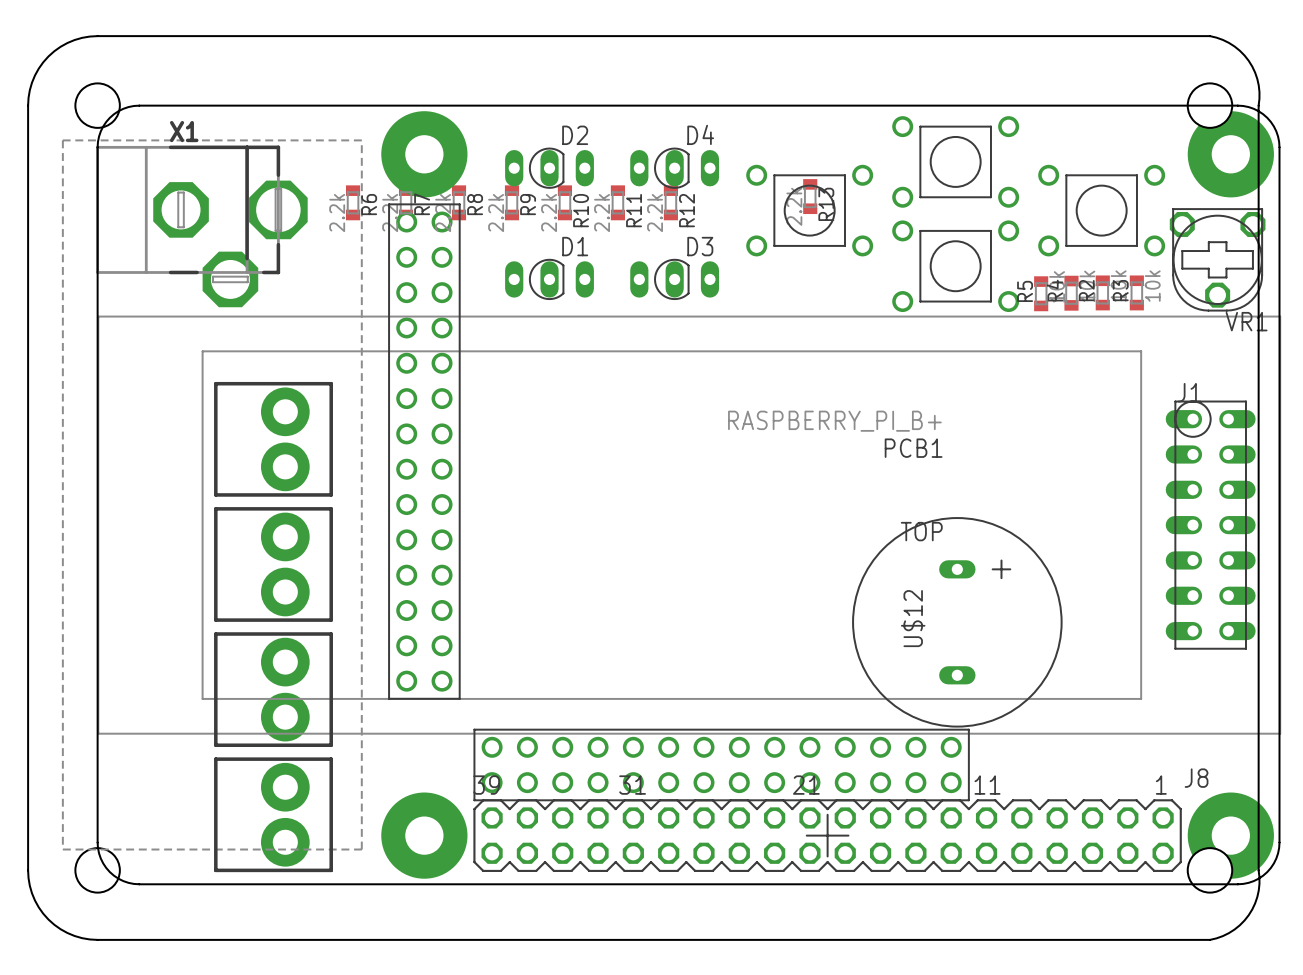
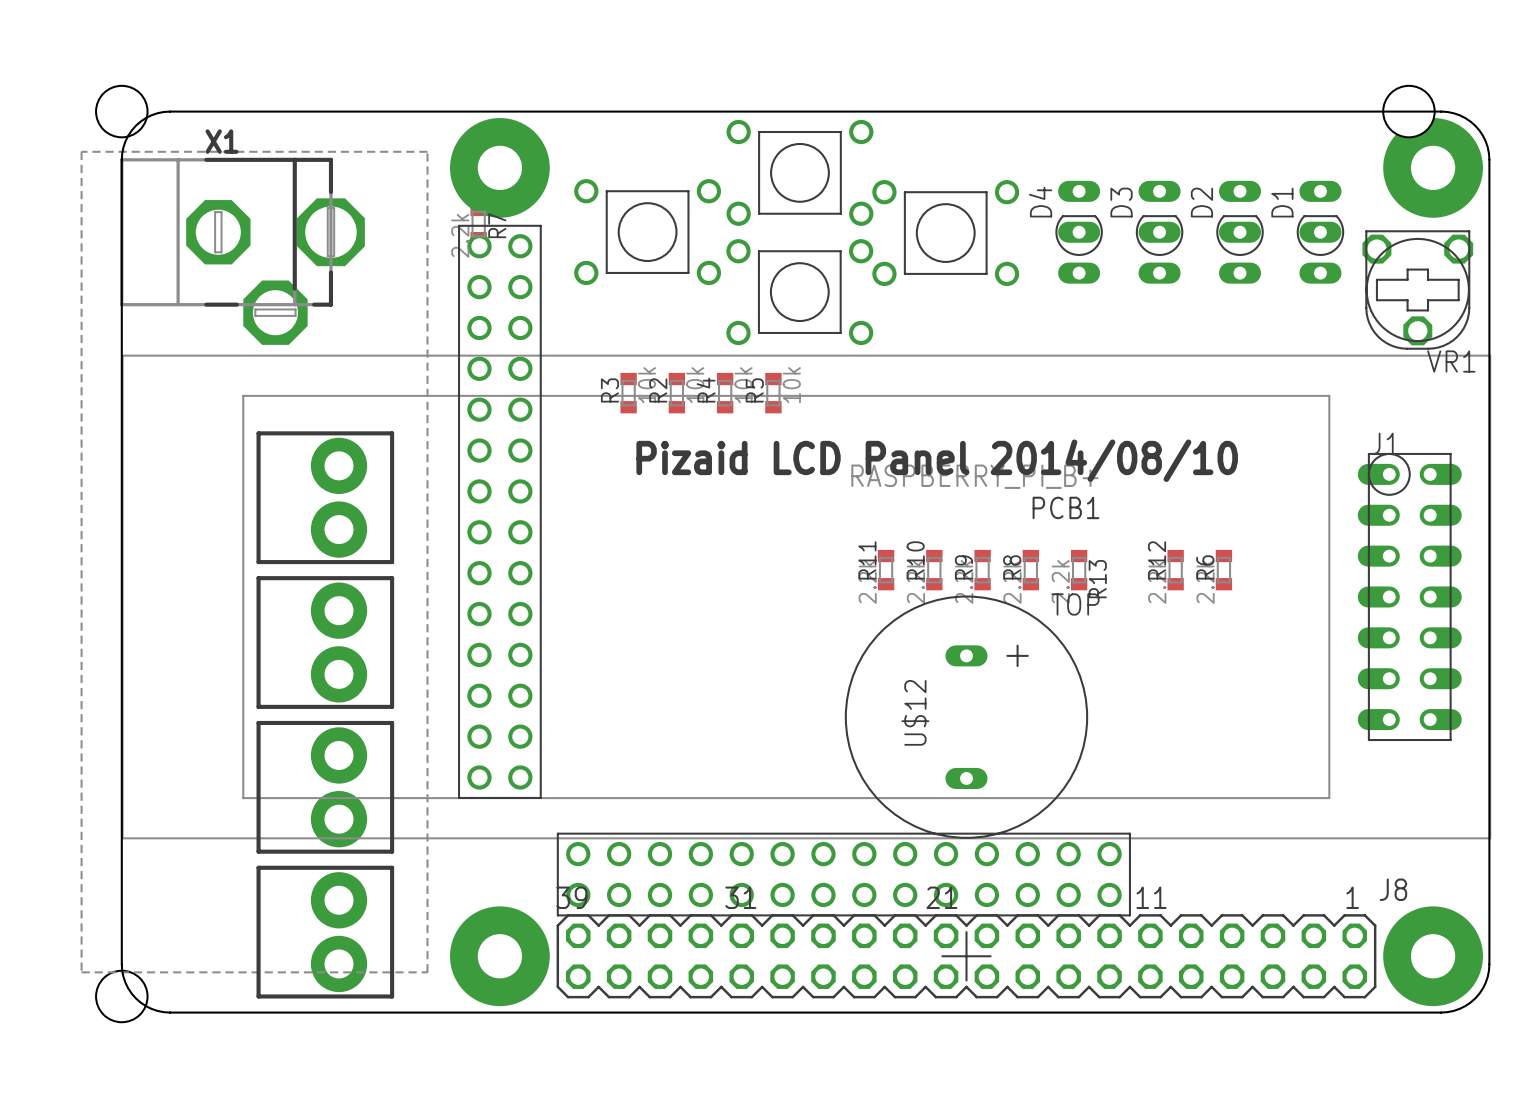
board edge: (97, 36) (1209, 36) (1222, 39) (1234, 46) (1244, 55) (1252, 66) (1257, 78) (1259, 92) (1259, 883) (1255, 903) (1248, 915) (1239, 925) (1228, 933) (1209, 939) (97, 939) (74, 935) (54, 924) (43, 913) (34, 900) (29, 885) (28, 870) (28, 105) (32, 82) (38, 68) (48, 56) (60, 46) (74, 40) (97, 36) -> none
part: none -> (799, 172)
part: (955, 161) -> none
D2 rotation: 0° (549, 168) -> 90° counterclockwise (1240, 232)
D2 position: (549, 168) -> (1240, 232)
D4 rotation: 0° (674, 168) -> 90° counterclockwise (1079, 232)
D4 position: (674, 168) -> (1079, 232)
R13 position: (810, 196) -> (1079, 570)
R6 position: (353, 202) -> (1223, 570)
R8 position: (459, 202) -> (1030, 570)
R9 position: (511, 202) -> (982, 570)
R10 position: (564, 202) -> (934, 570)
R11 position: (617, 202) -> (886, 570)
R12 position: (670, 202) -> (1175, 570)
R6 name position: R6 (369, 204) -> R6 (1205, 567)
R8 name position: R8 (475, 204) -> R8 (1012, 567)
R9 name position: R9 (528, 204) -> R9 (963, 567)
part: none -> (647, 232)
R10 name position: R10 (581, 210) -> R10 (915, 560)
R11 name position: R11 (634, 210) -> R11 (867, 560)
R12 name position: R12 (687, 210) -> R12 (1157, 560)
part: (1101, 210) -> none
part: none -> (799, 292)
part: (955, 266) -> none
D1 rotation: 0° (549, 279) -> 90° counterclockwise (1320, 232)
D1 position: (549, 279) -> (1320, 232)
D3 rotation: 0° (674, 279) -> 90° counterclockwise (1159, 232)
D3 position: (674, 279) -> (1159, 232)
R2 position: (1102, 292) -> (676, 393)
R3 position: (1136, 292) -> (628, 393)
R5 position: (1041, 293) -> (773, 393)
R4 position: (1071, 293) -> (725, 393)
text: none -> Pizaid LCD Panel 2014/08/10 (937, 460)
U$12 position: (957, 622) -> (966, 717)
hole: (1209, 870) -> none

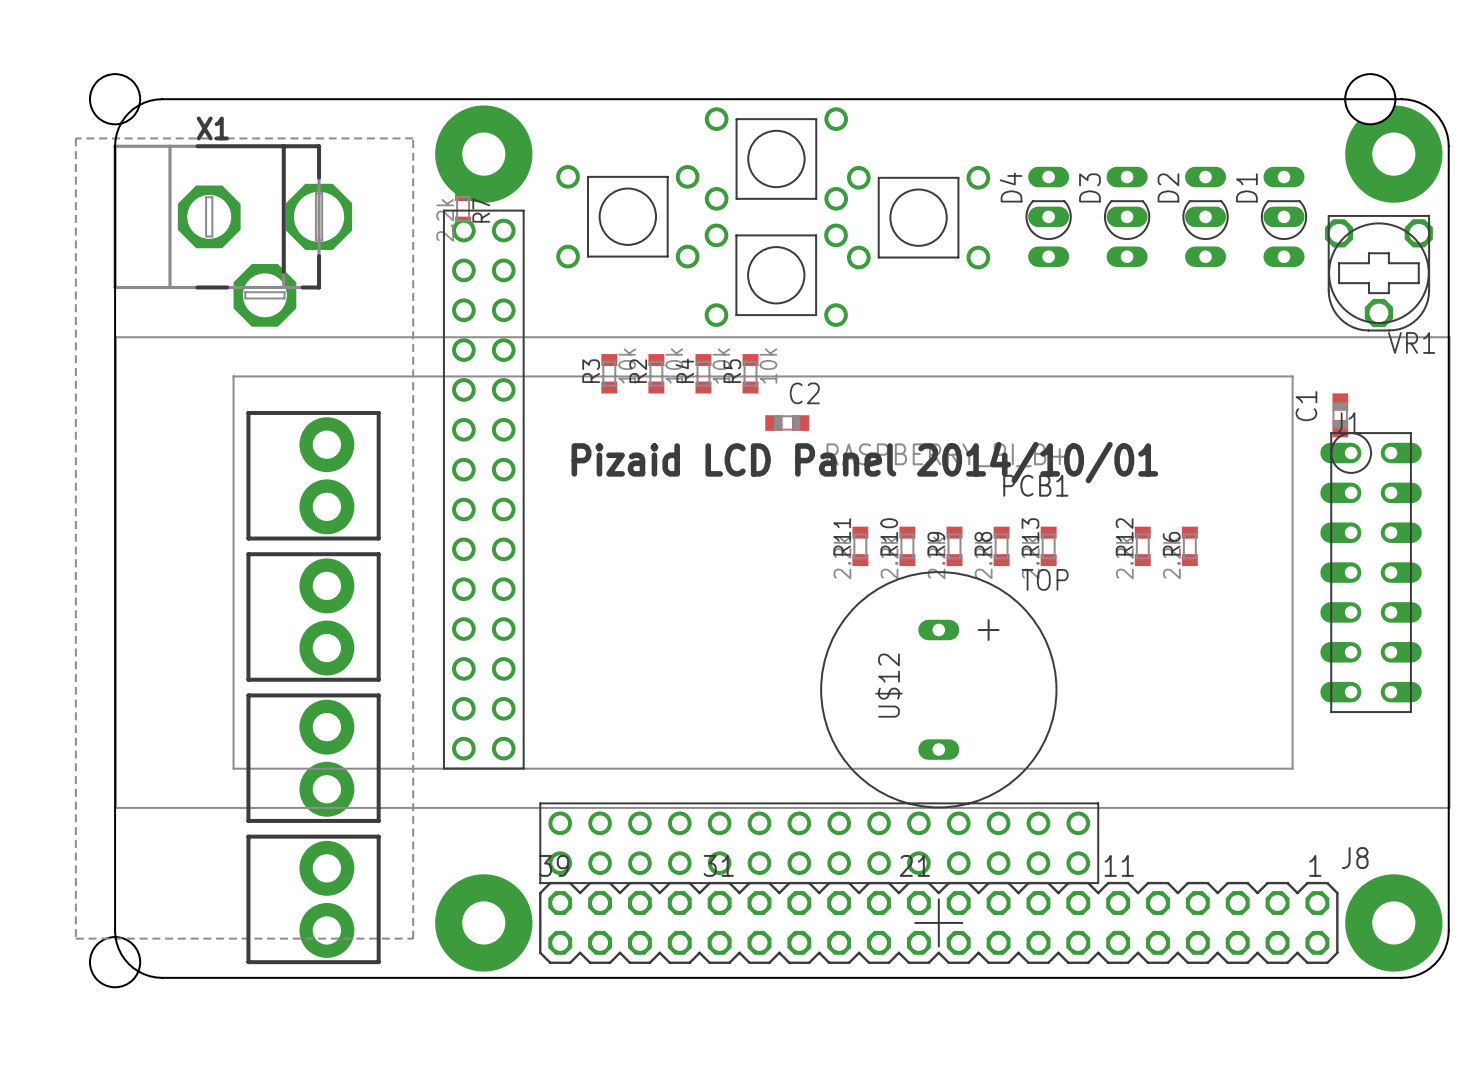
PCB1 footprint: [80, 110, 1491, 1014] -> [74, 105, 1443, 972]
C1: none -> (1340, 415)
C2: none -> (787, 423)
text: Pizaid LCD Panel 2014/08/10 (937, 460) -> Pizaid LCD Panel 2014/10/01 (864, 462)
R13 name position: R13 (1097, 579) -> R13 (1030, 536)

